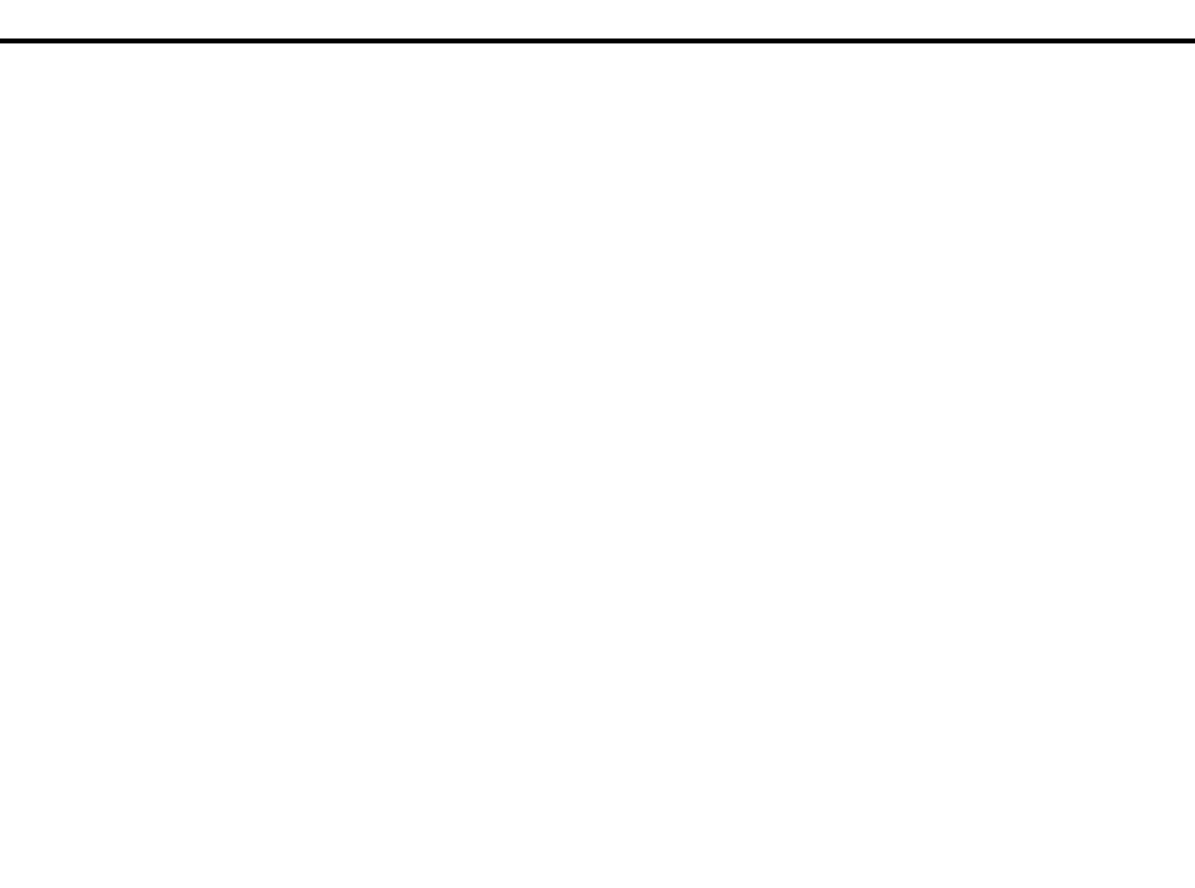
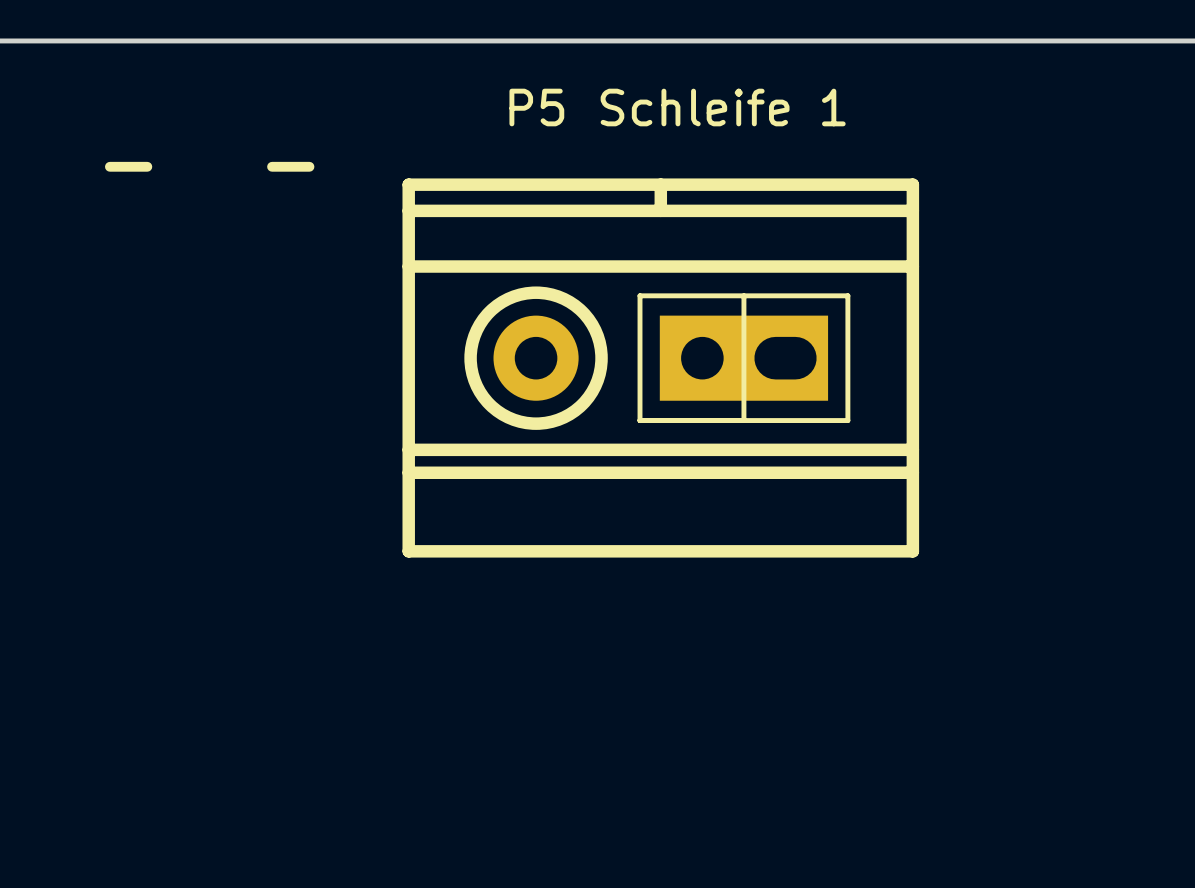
text: none -> - (128, 166)
text: none -> - (290, 166)
P5: none -> Schleife 1 (660, 368)

